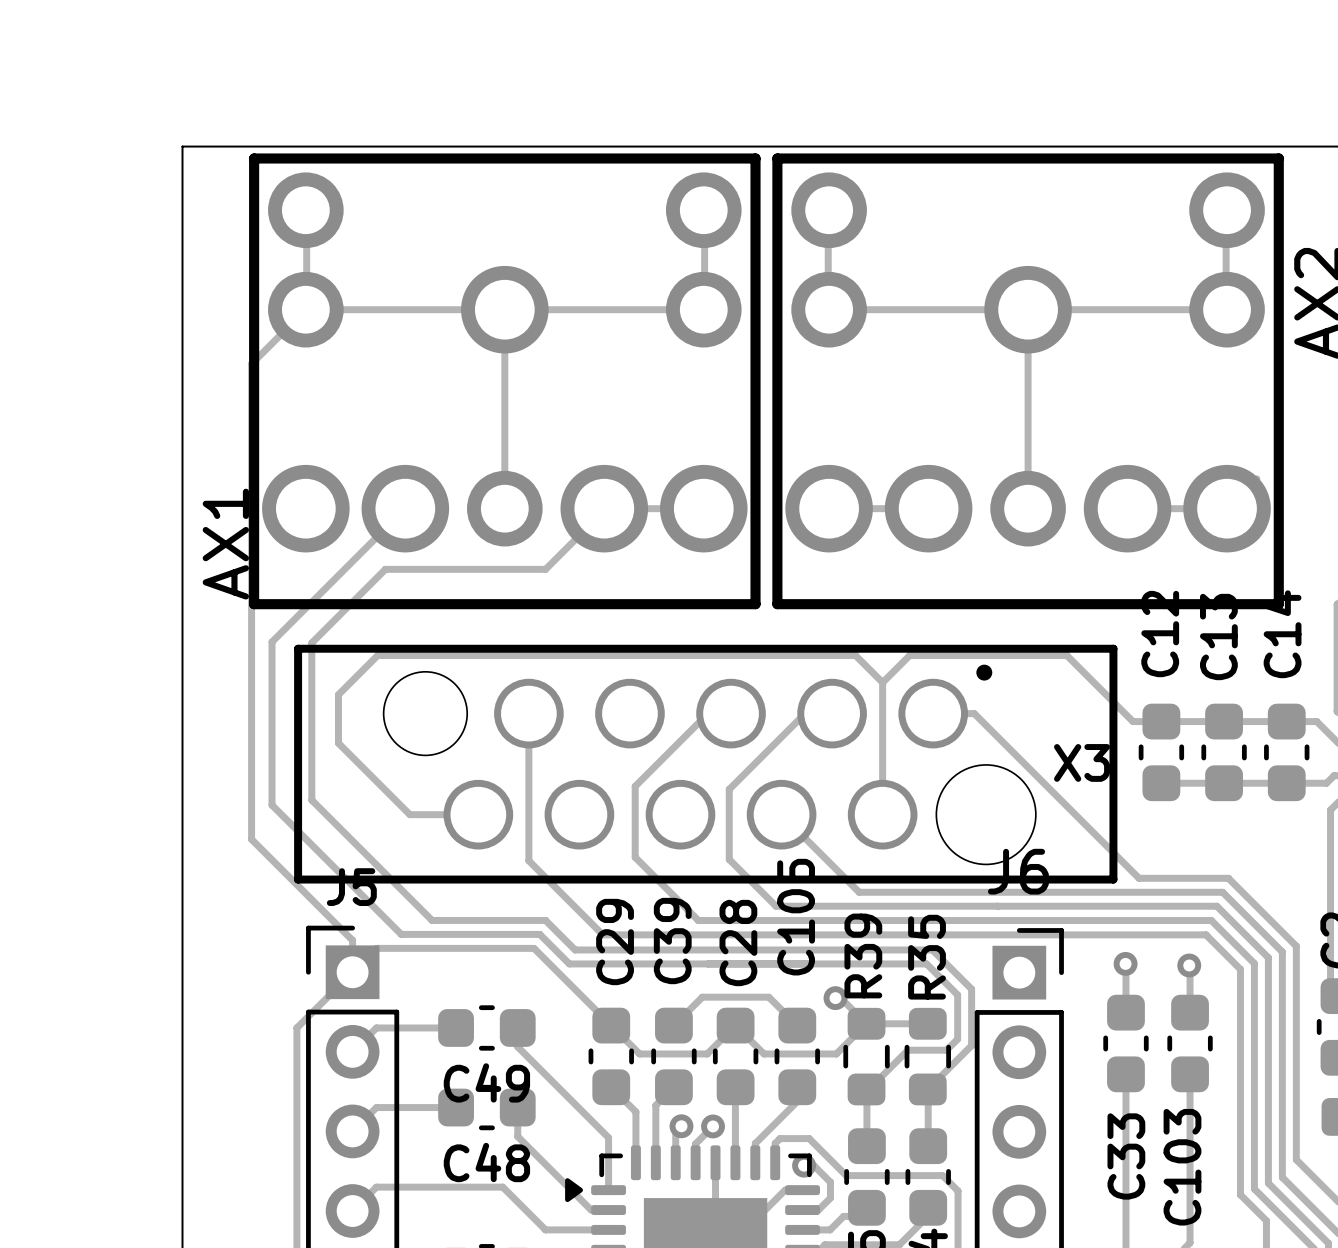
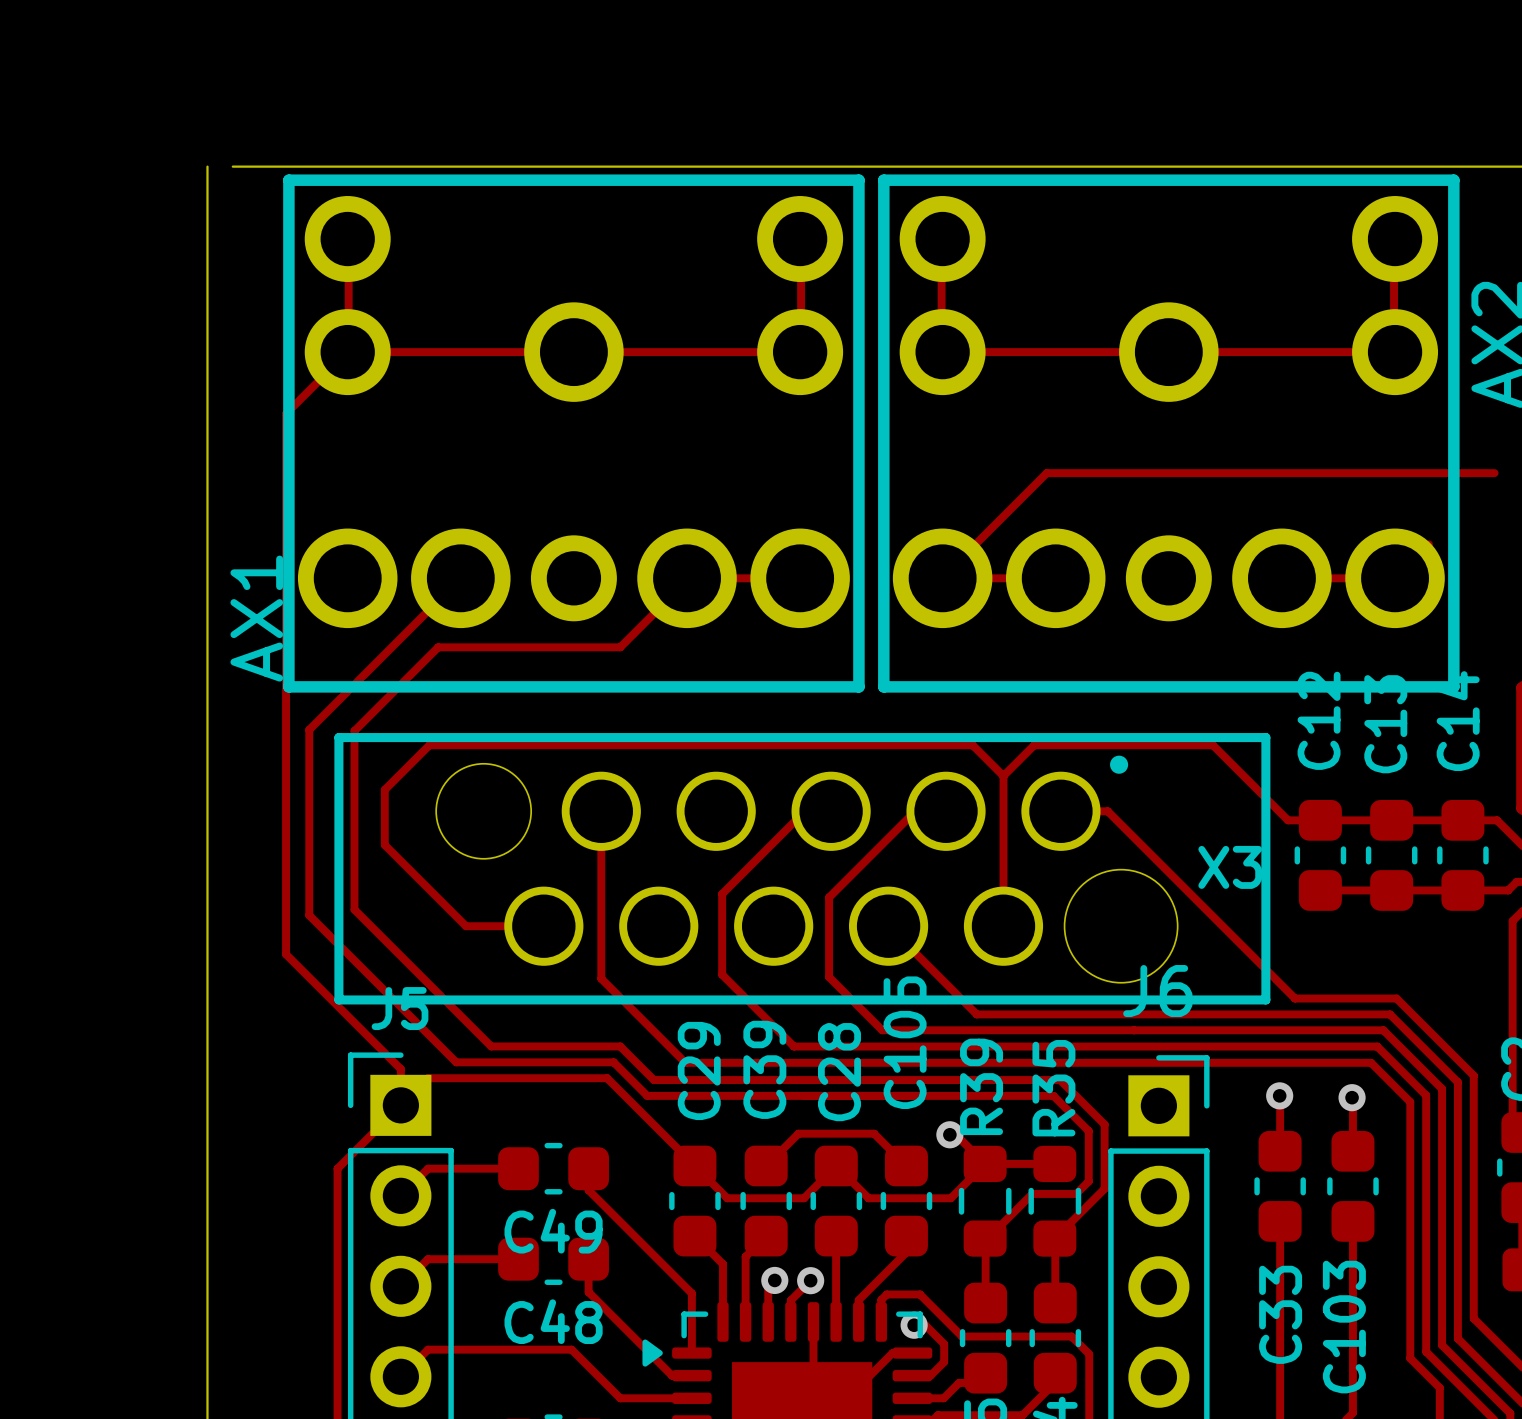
board edge: (182, 146) (204, 146) -> none
track: (504, 309) (504, 508) -> none
track: (1028, 309) (1028, 508) -> none
track: none -> (1494, 473) (1046, 473) (941, 578)

